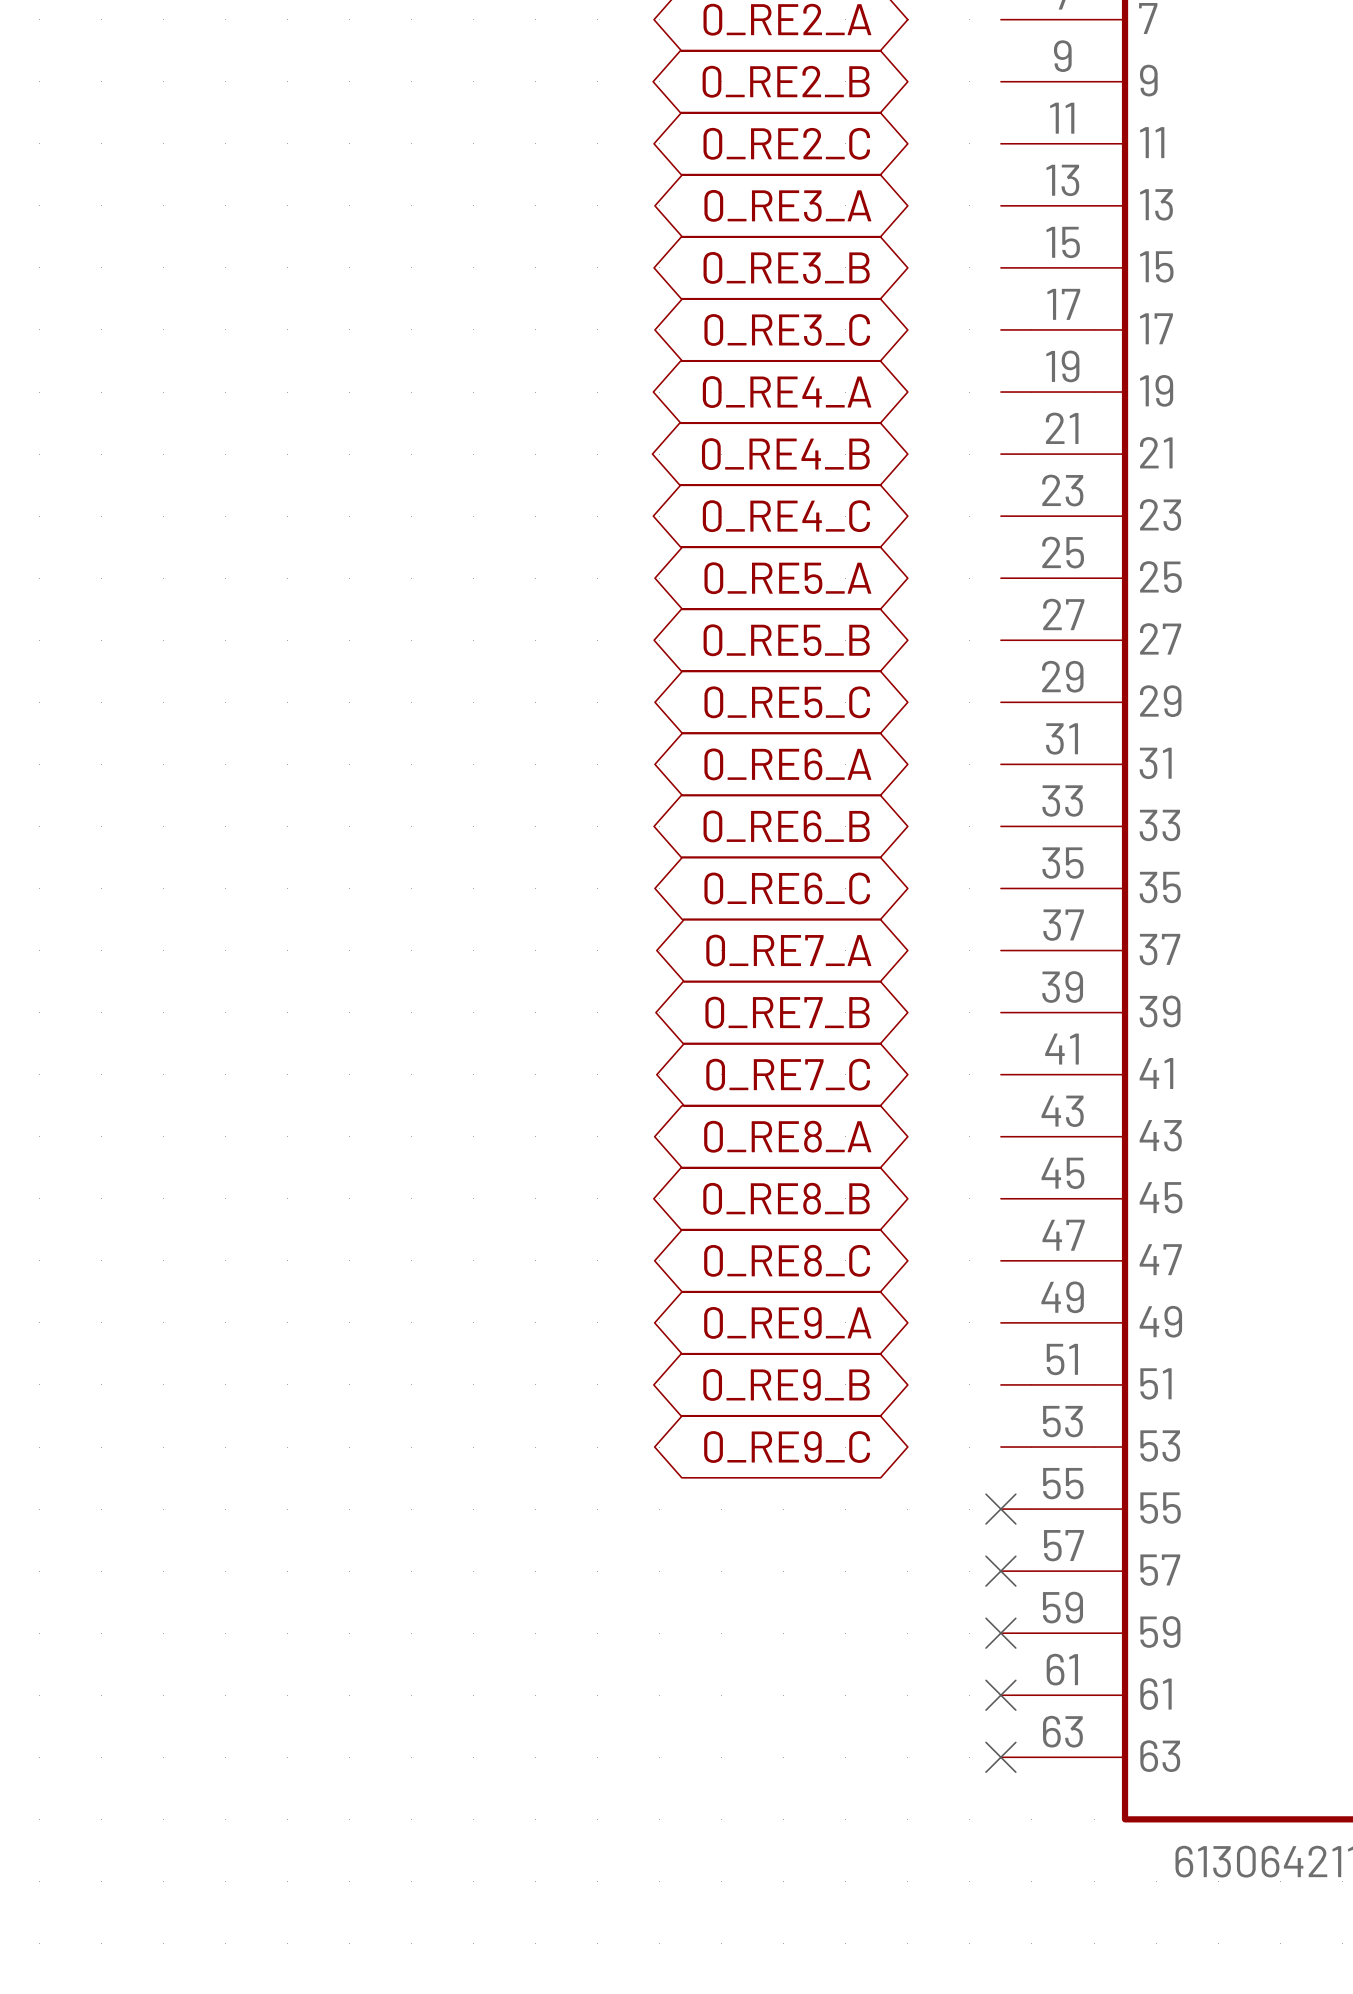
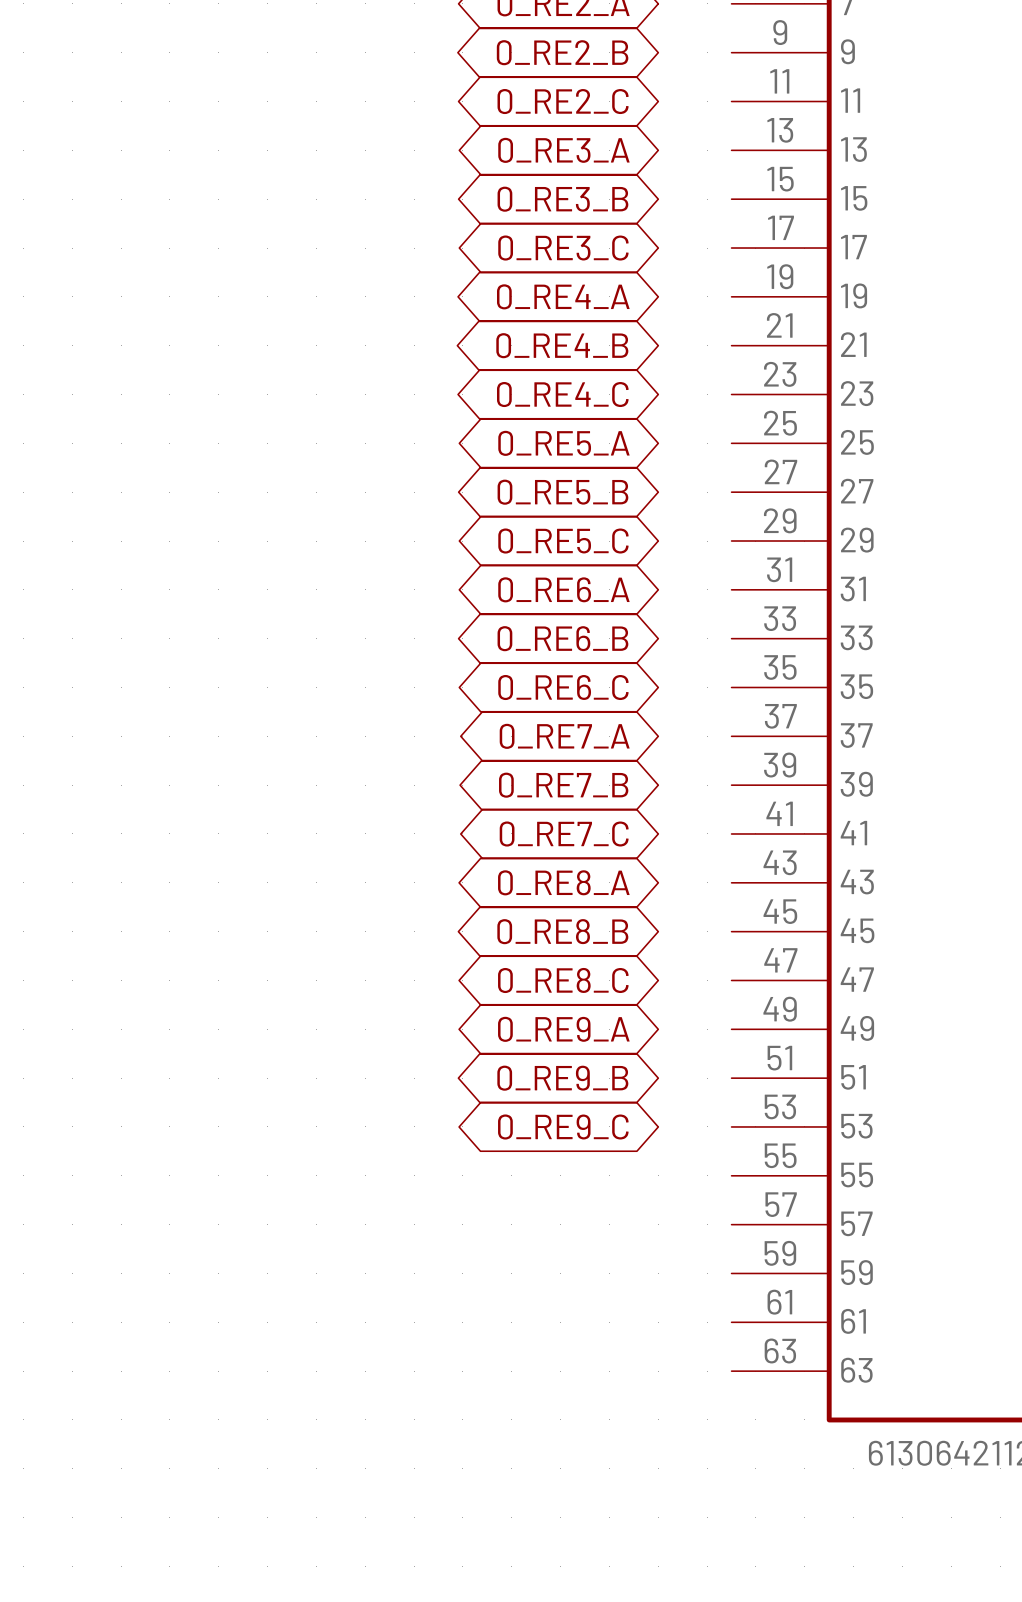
no-connect mark: (1000, 1509) -> none
no-connect mark: (1000, 1571) -> none
no-connect mark: (1000, 1633) -> none
no-connect mark: (1000, 1695) -> none
no-connect mark: (1000, 1757) -> none

